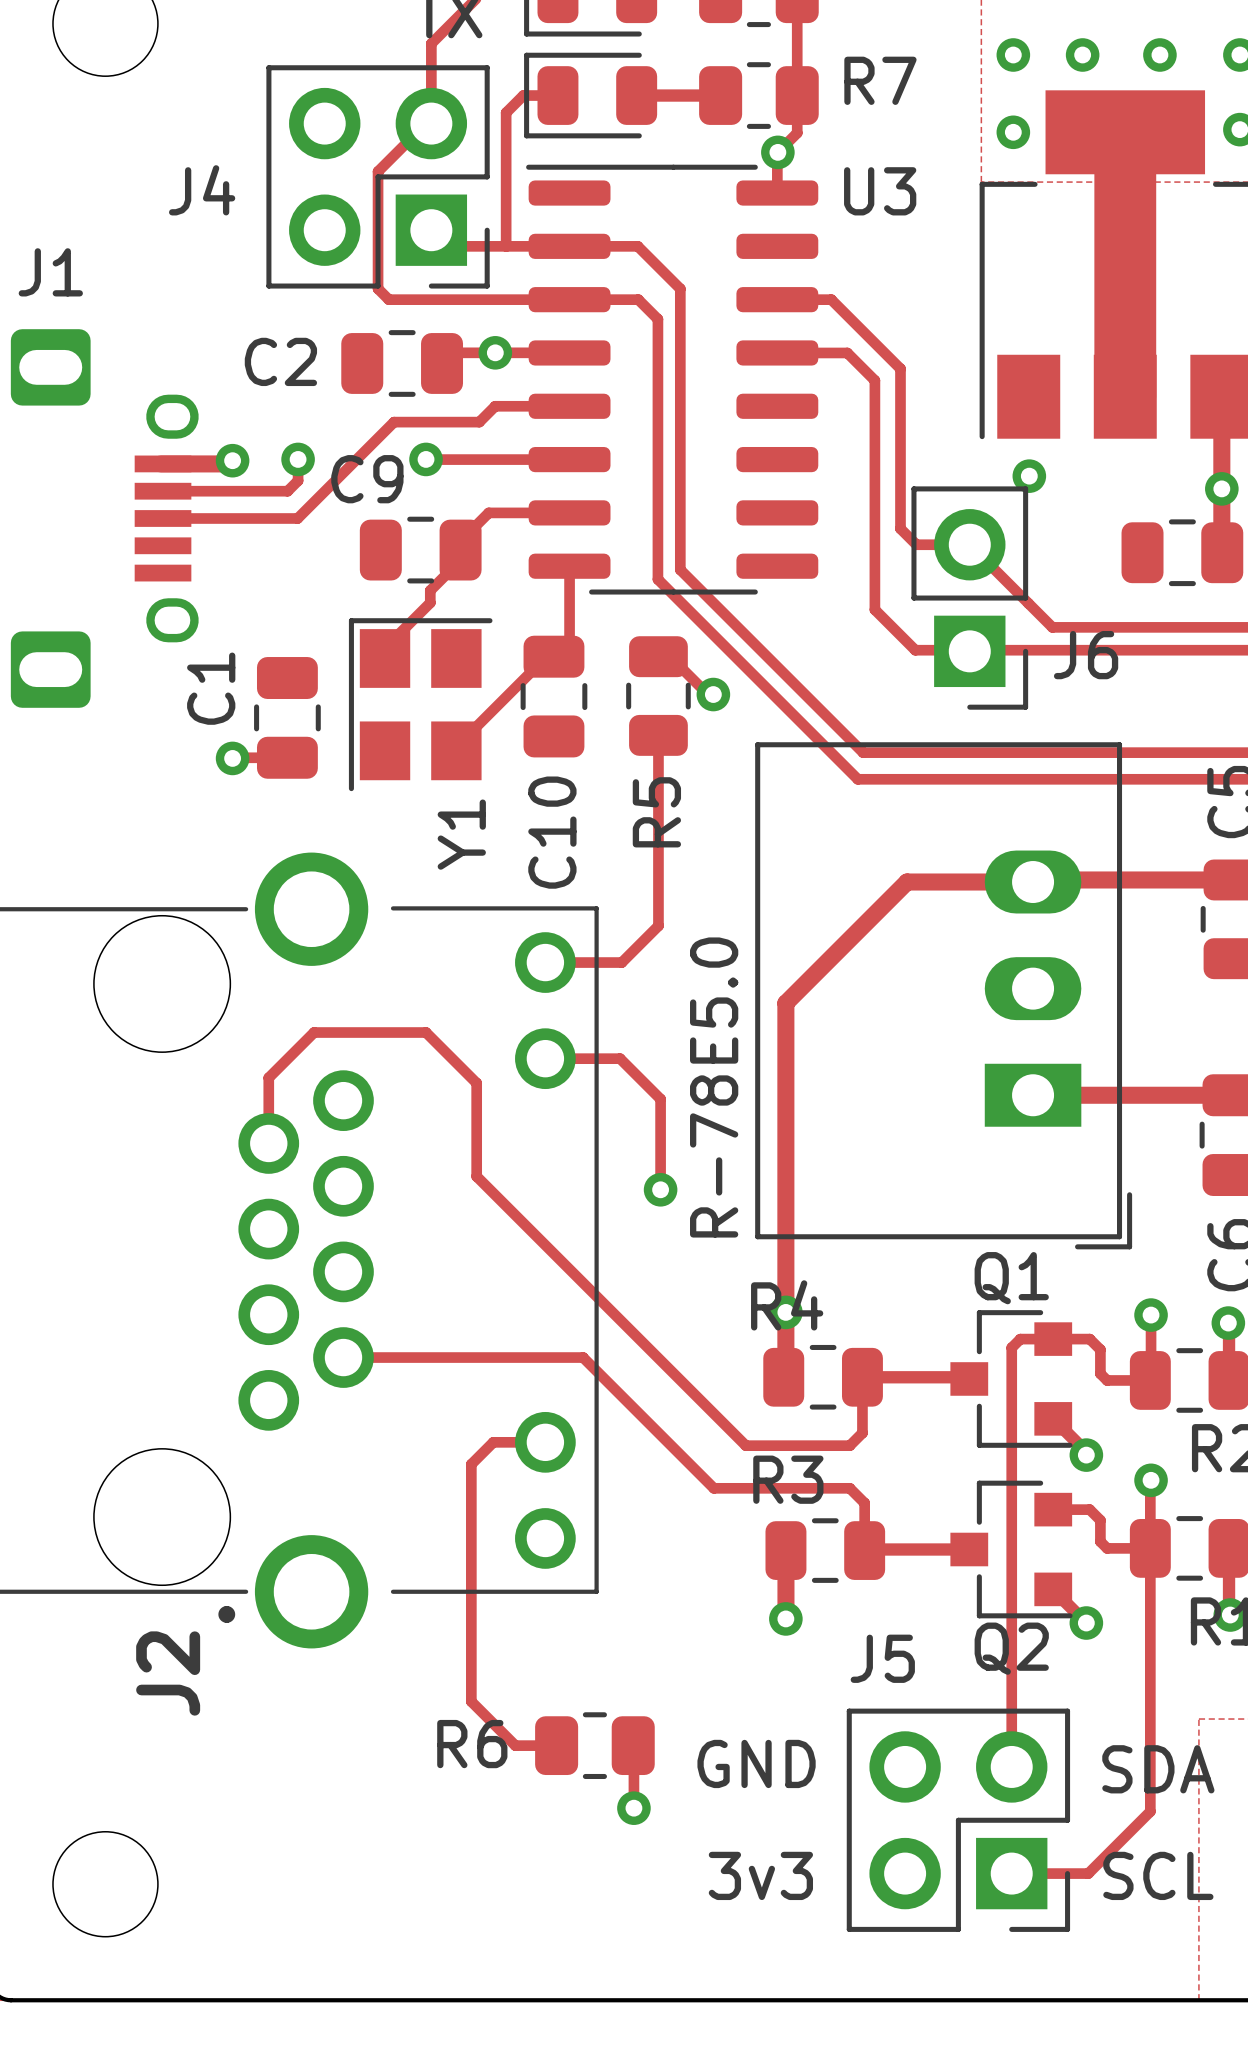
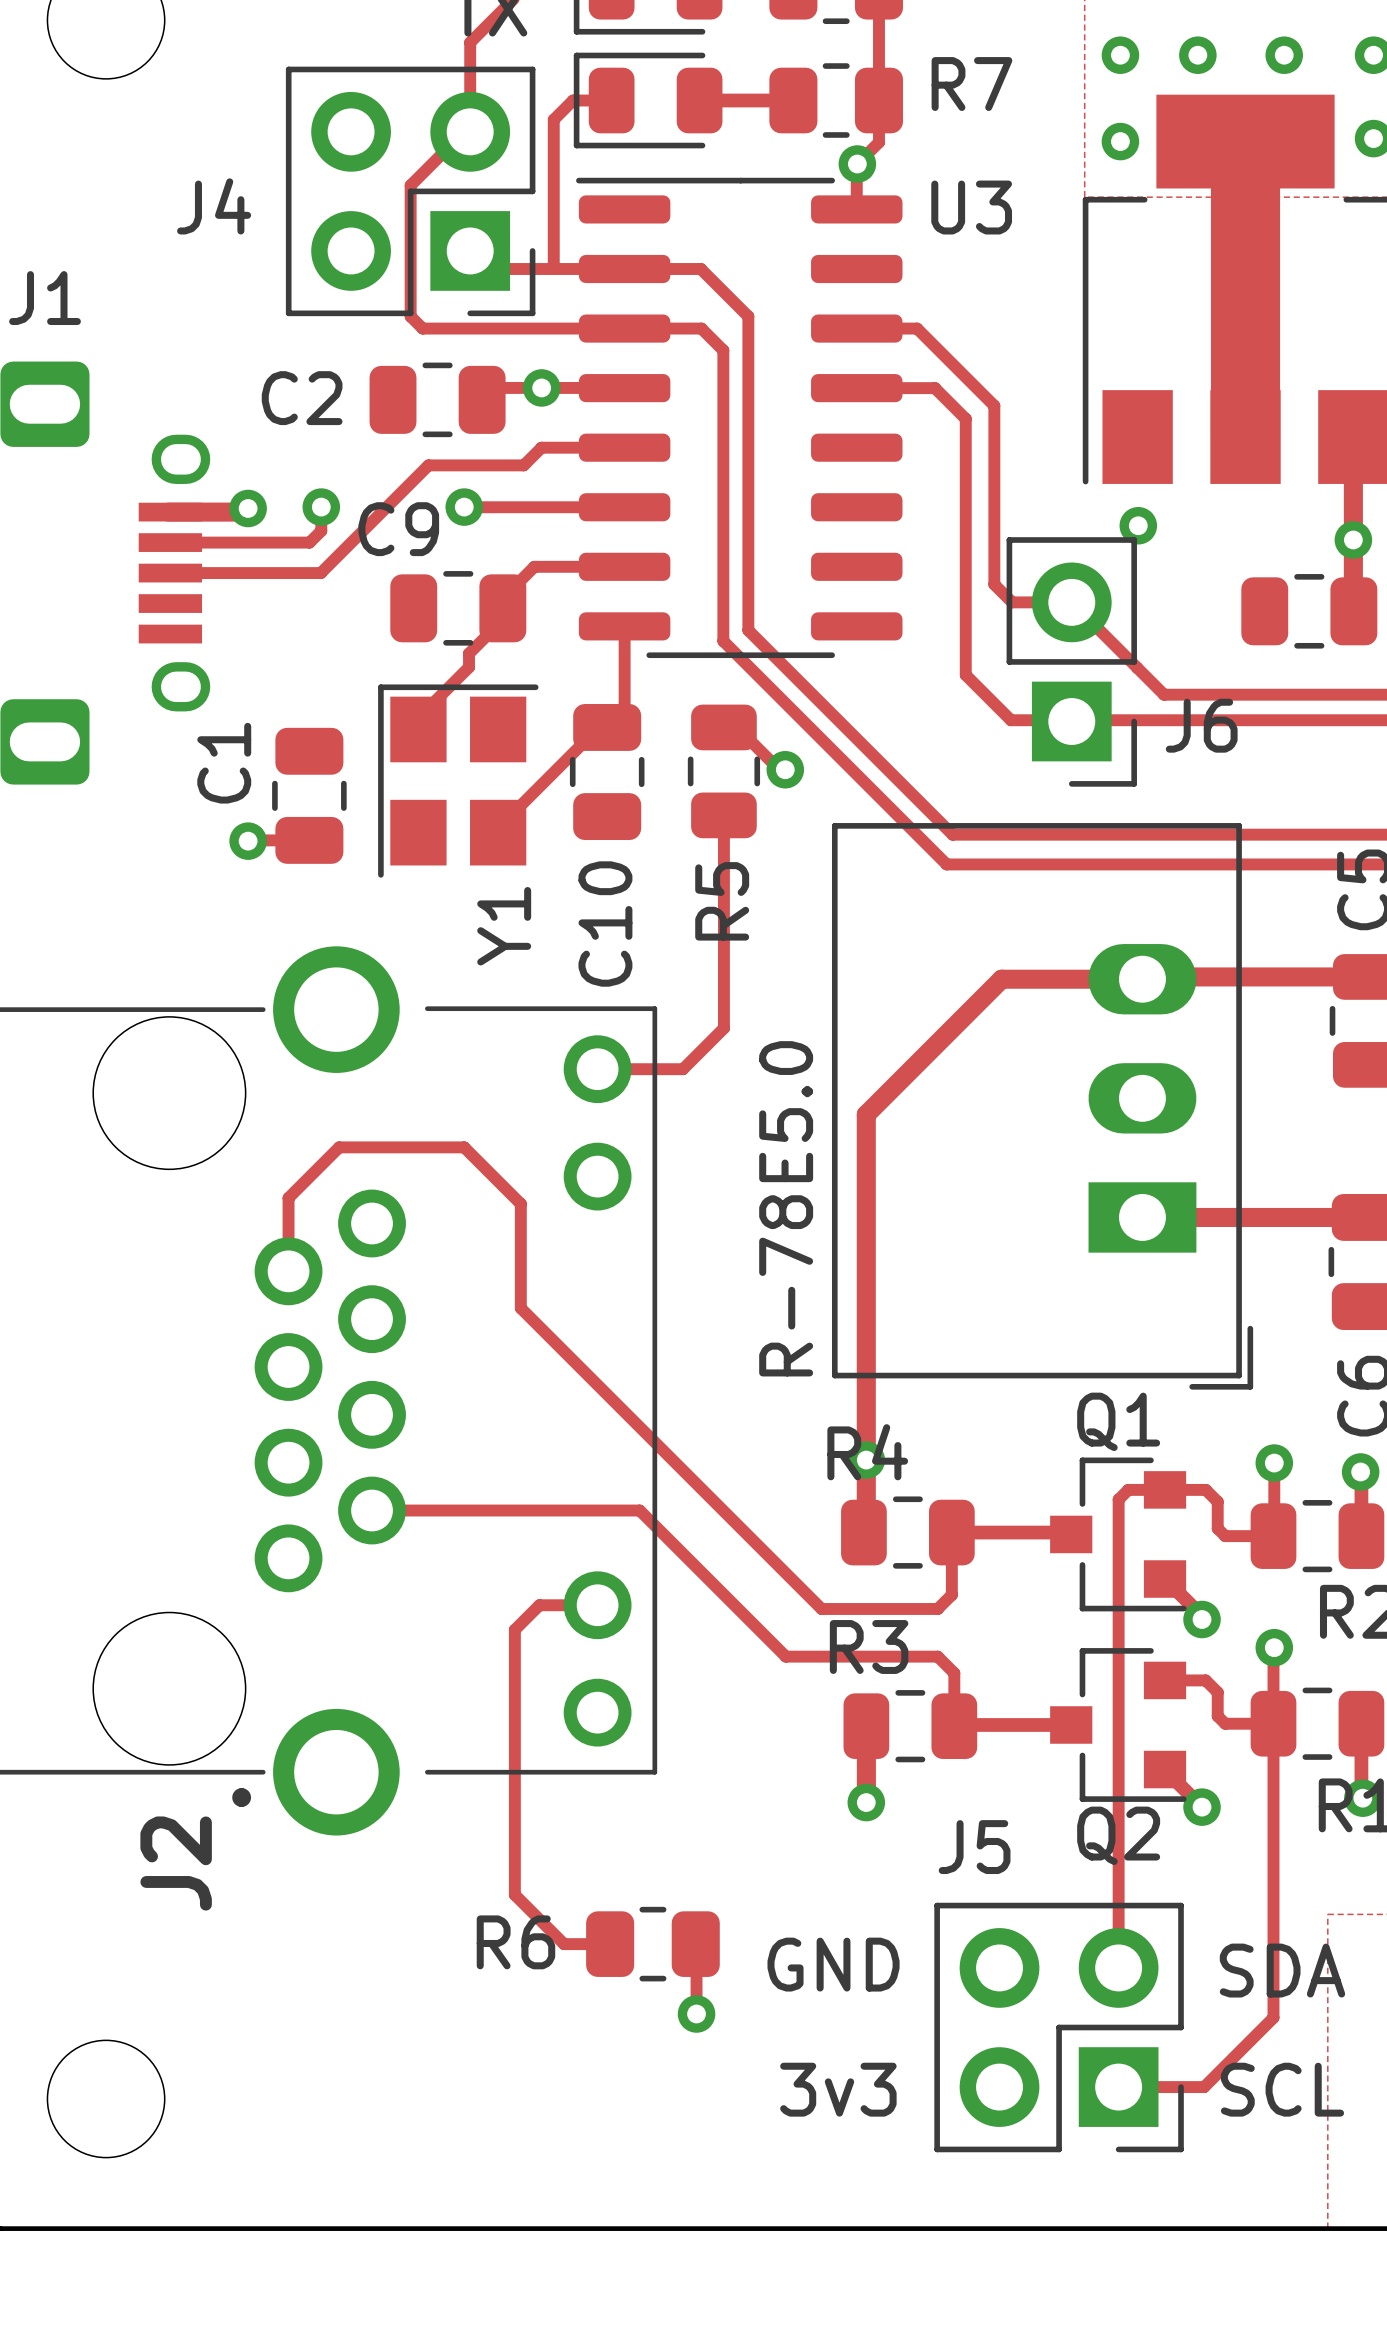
track: (545, 1058) (620, 1058) (660, 1099) (660, 1189) -> none
via: (660, 1189) -> none

